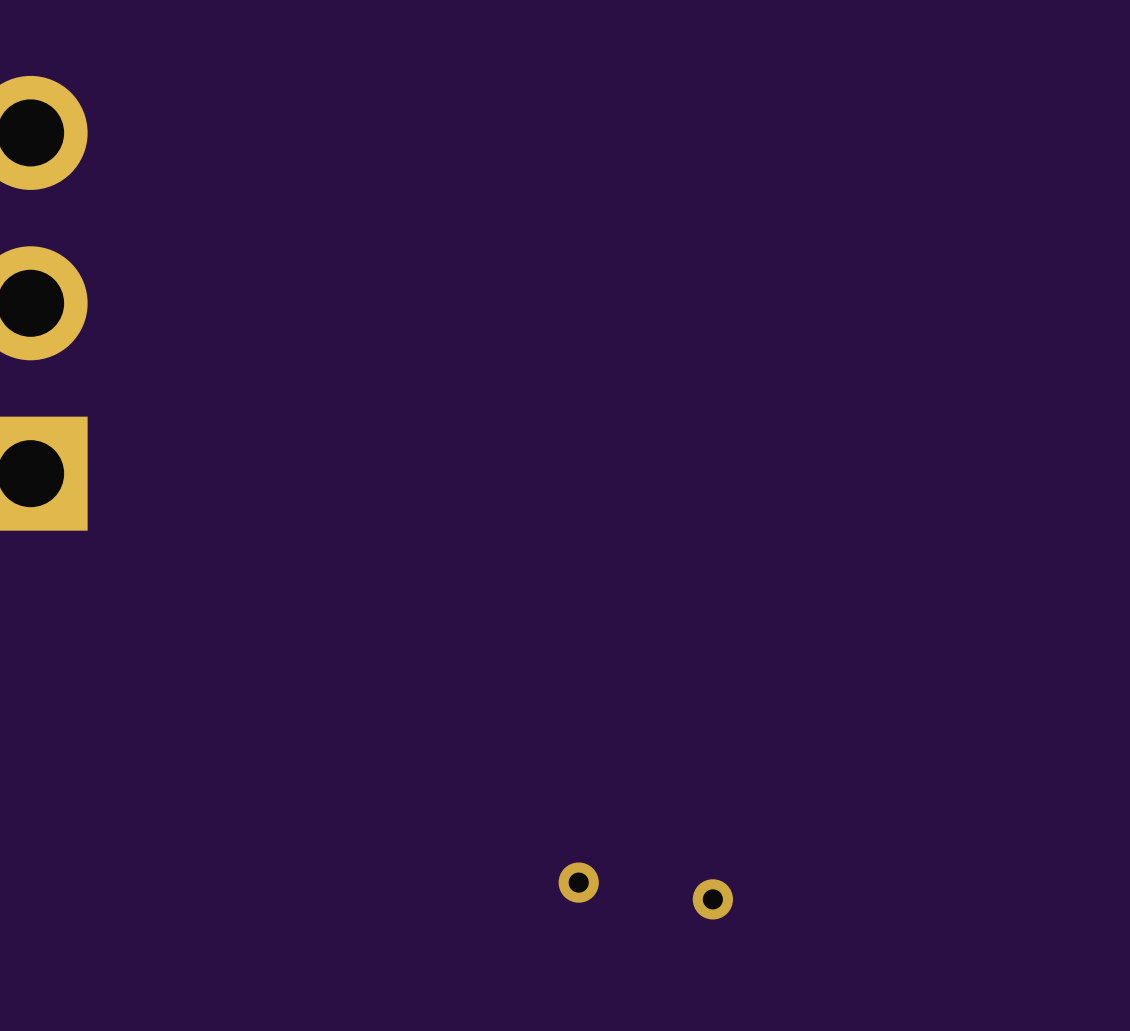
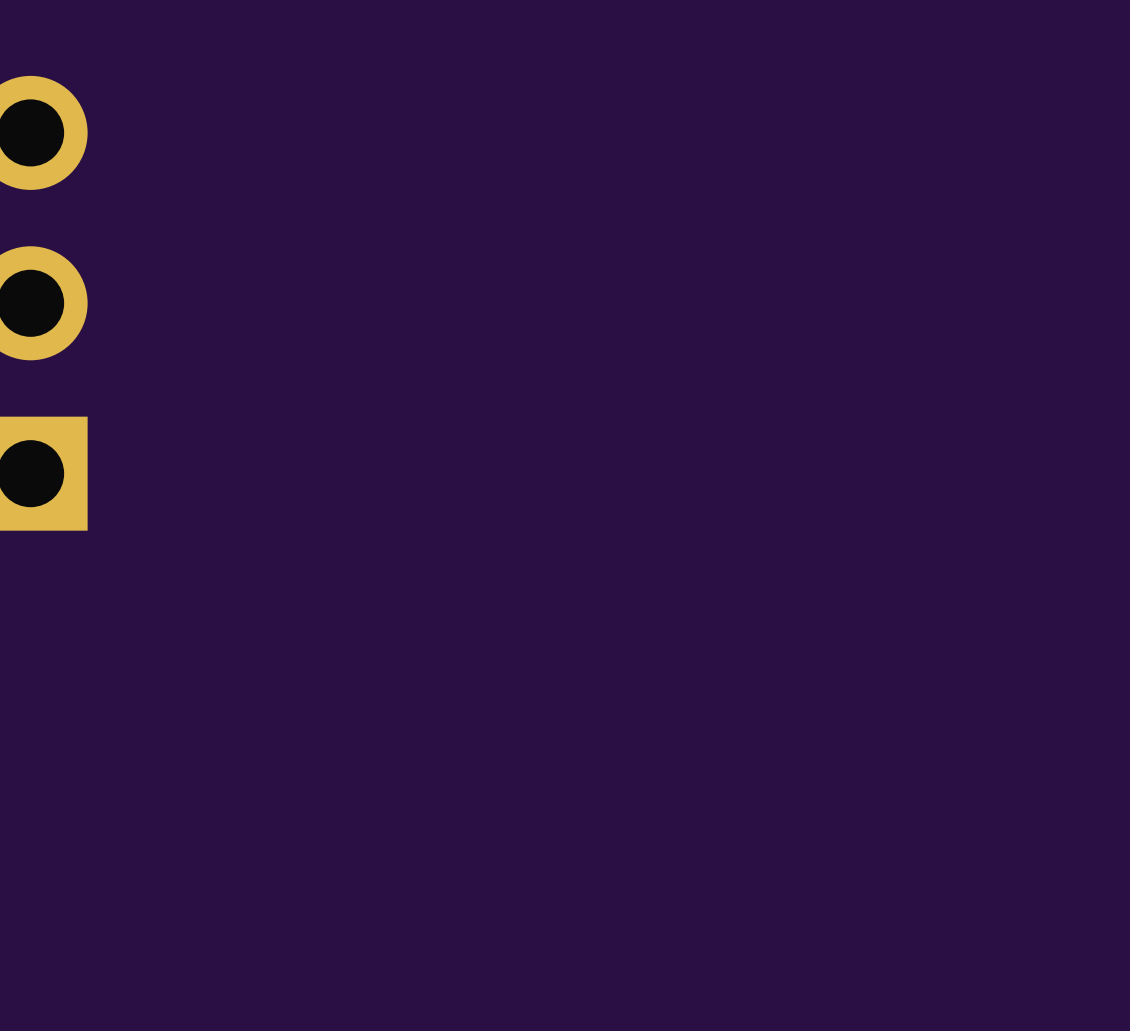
via: (578, 882) -> none
via: (712, 899) -> none

